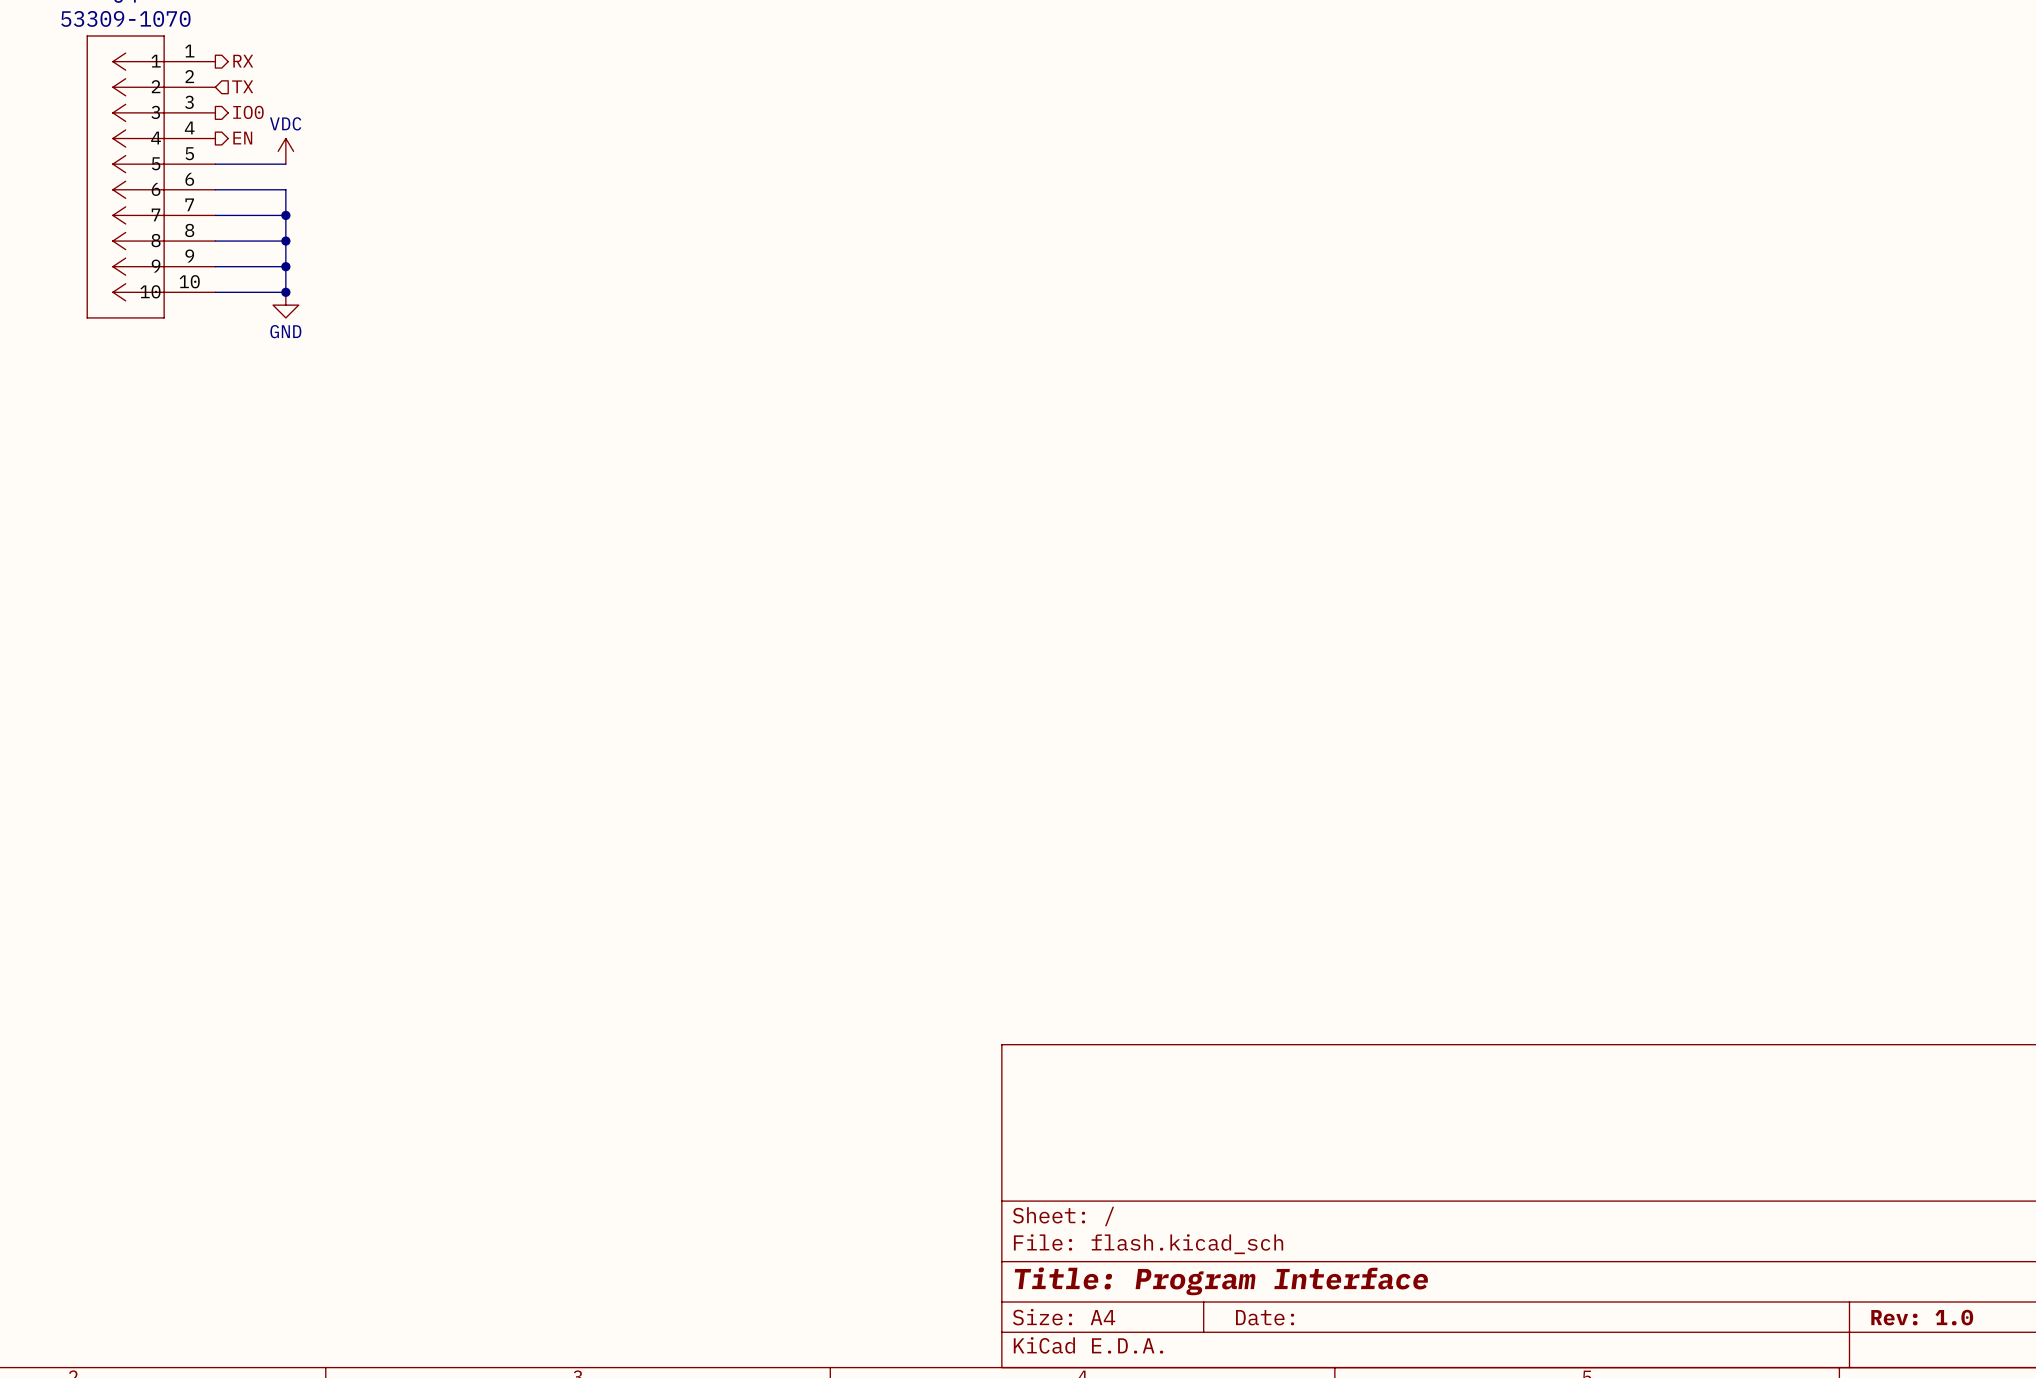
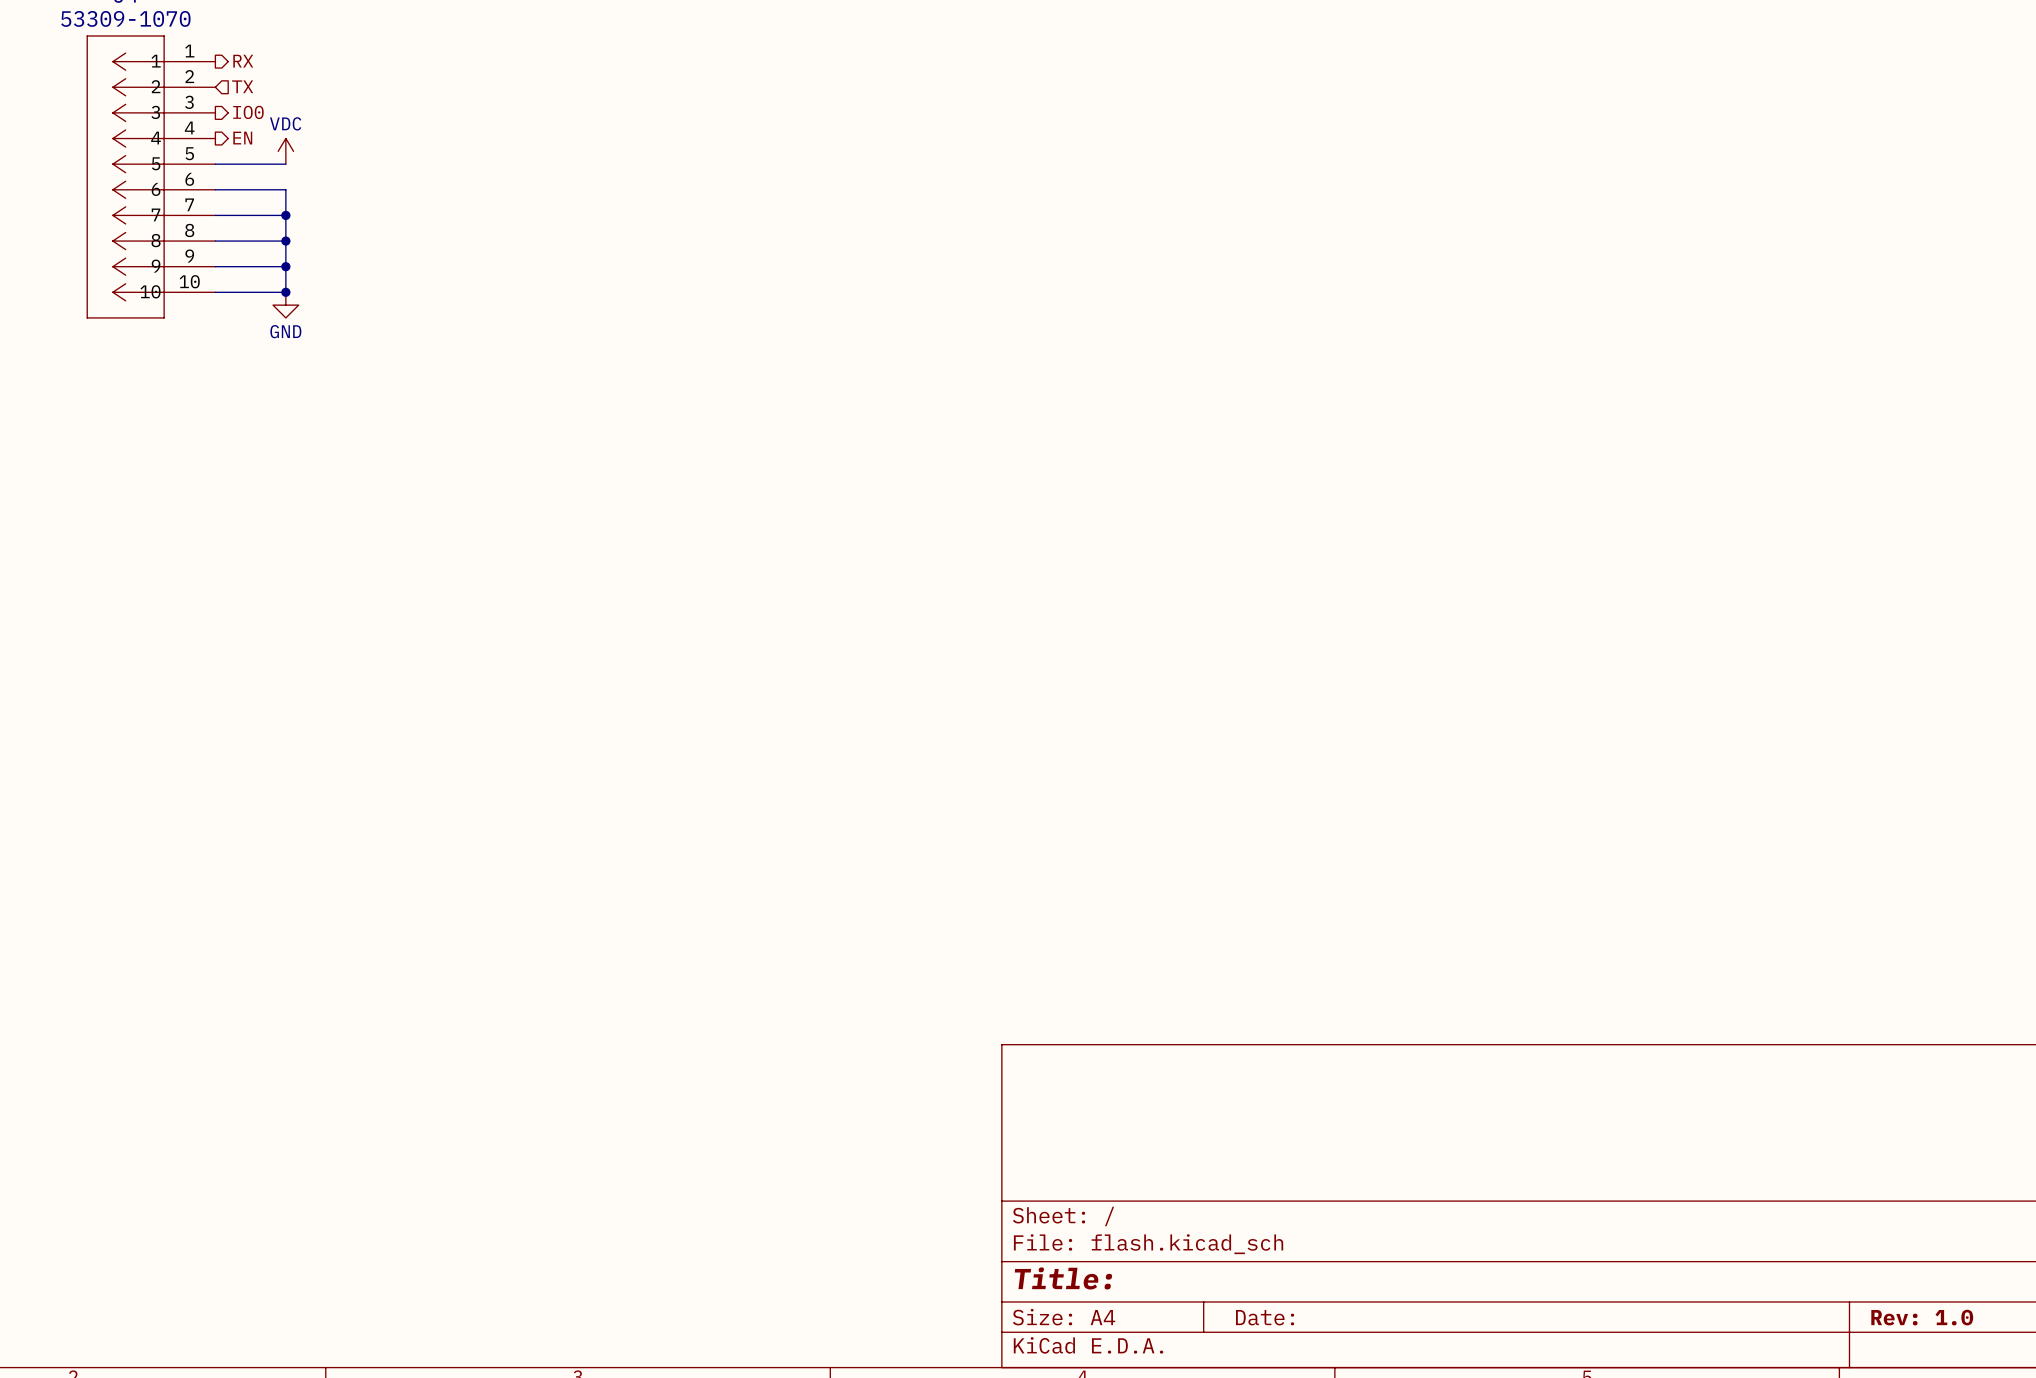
title block: Title: Program Interface (1221, 1281) -> Title: (1063, 1278)

